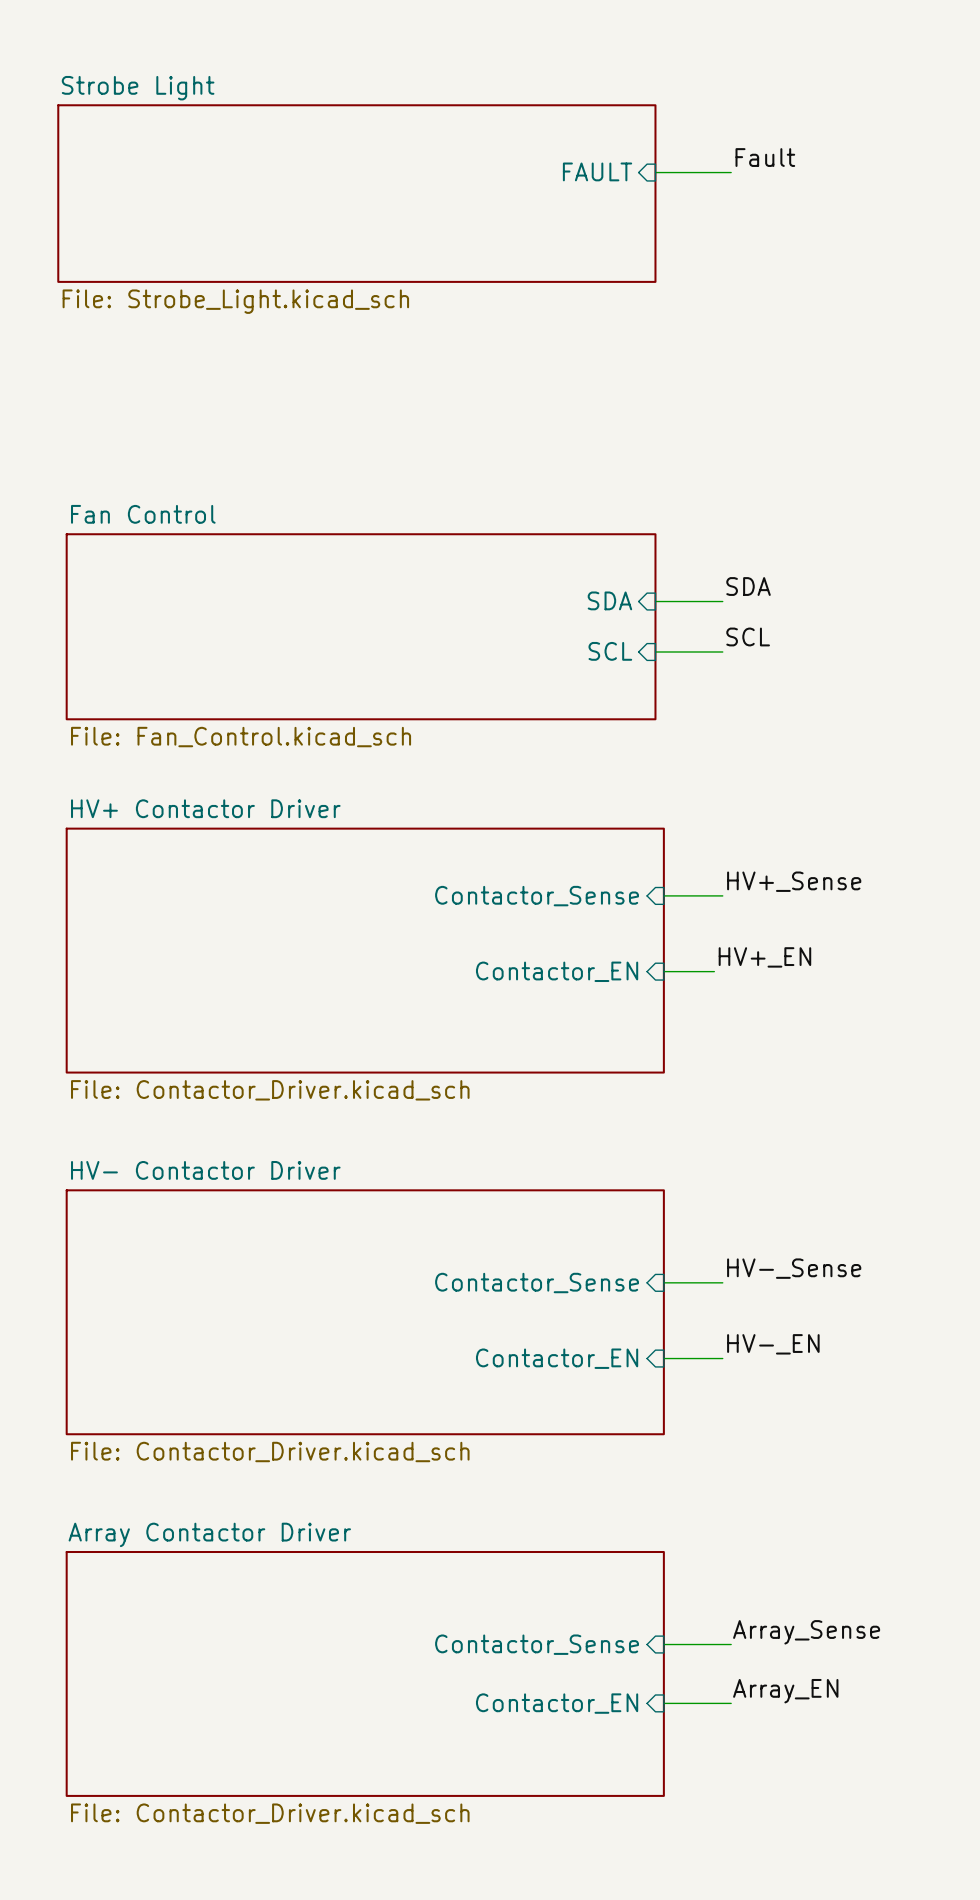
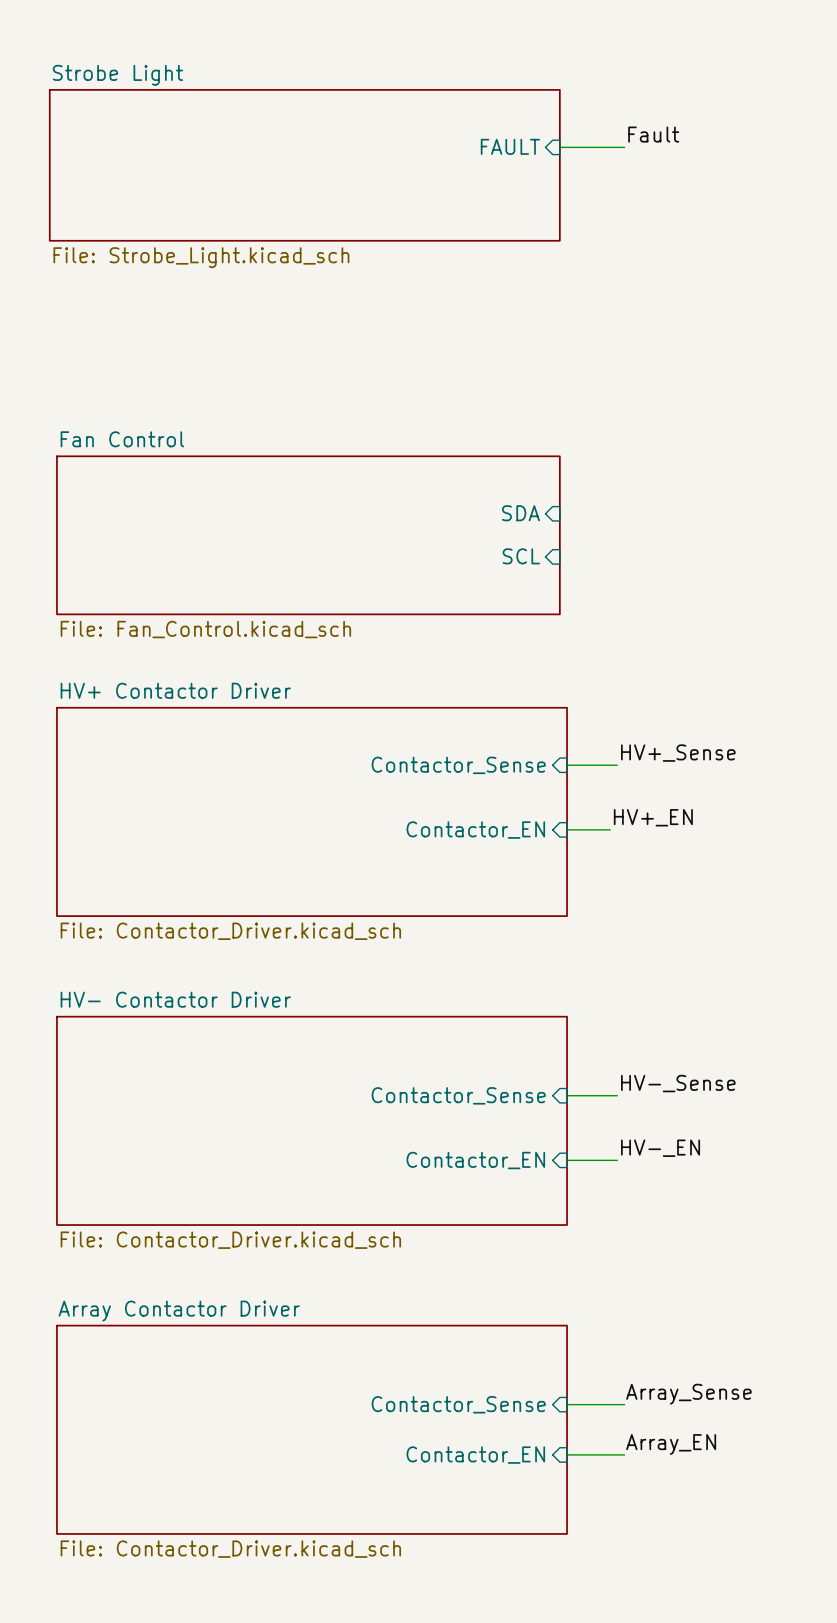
label: SDA (748, 586) -> none
wire: (655, 601) (722, 601) -> none
label: SCL (748, 636) -> none
wire: (655, 651) (722, 651) -> none

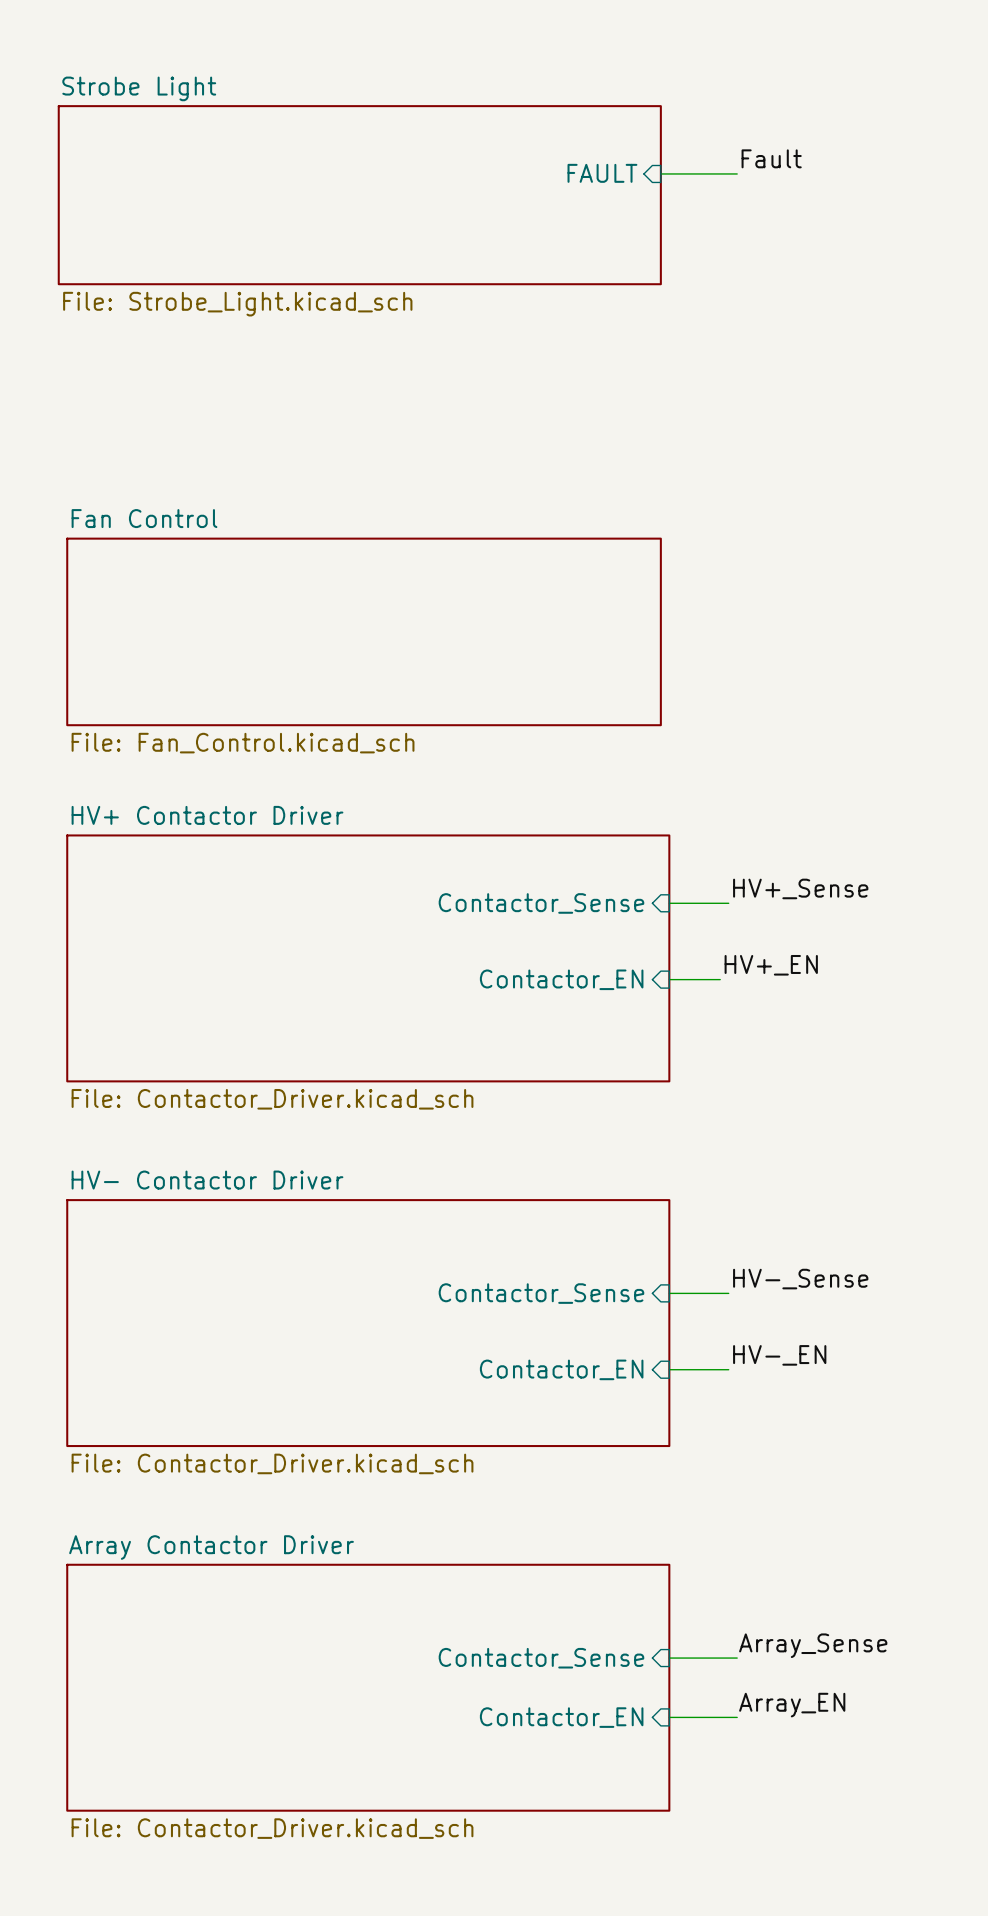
sheet pin: SDA (520, 513) -> none
sheet pin: SCL (521, 556) -> none

